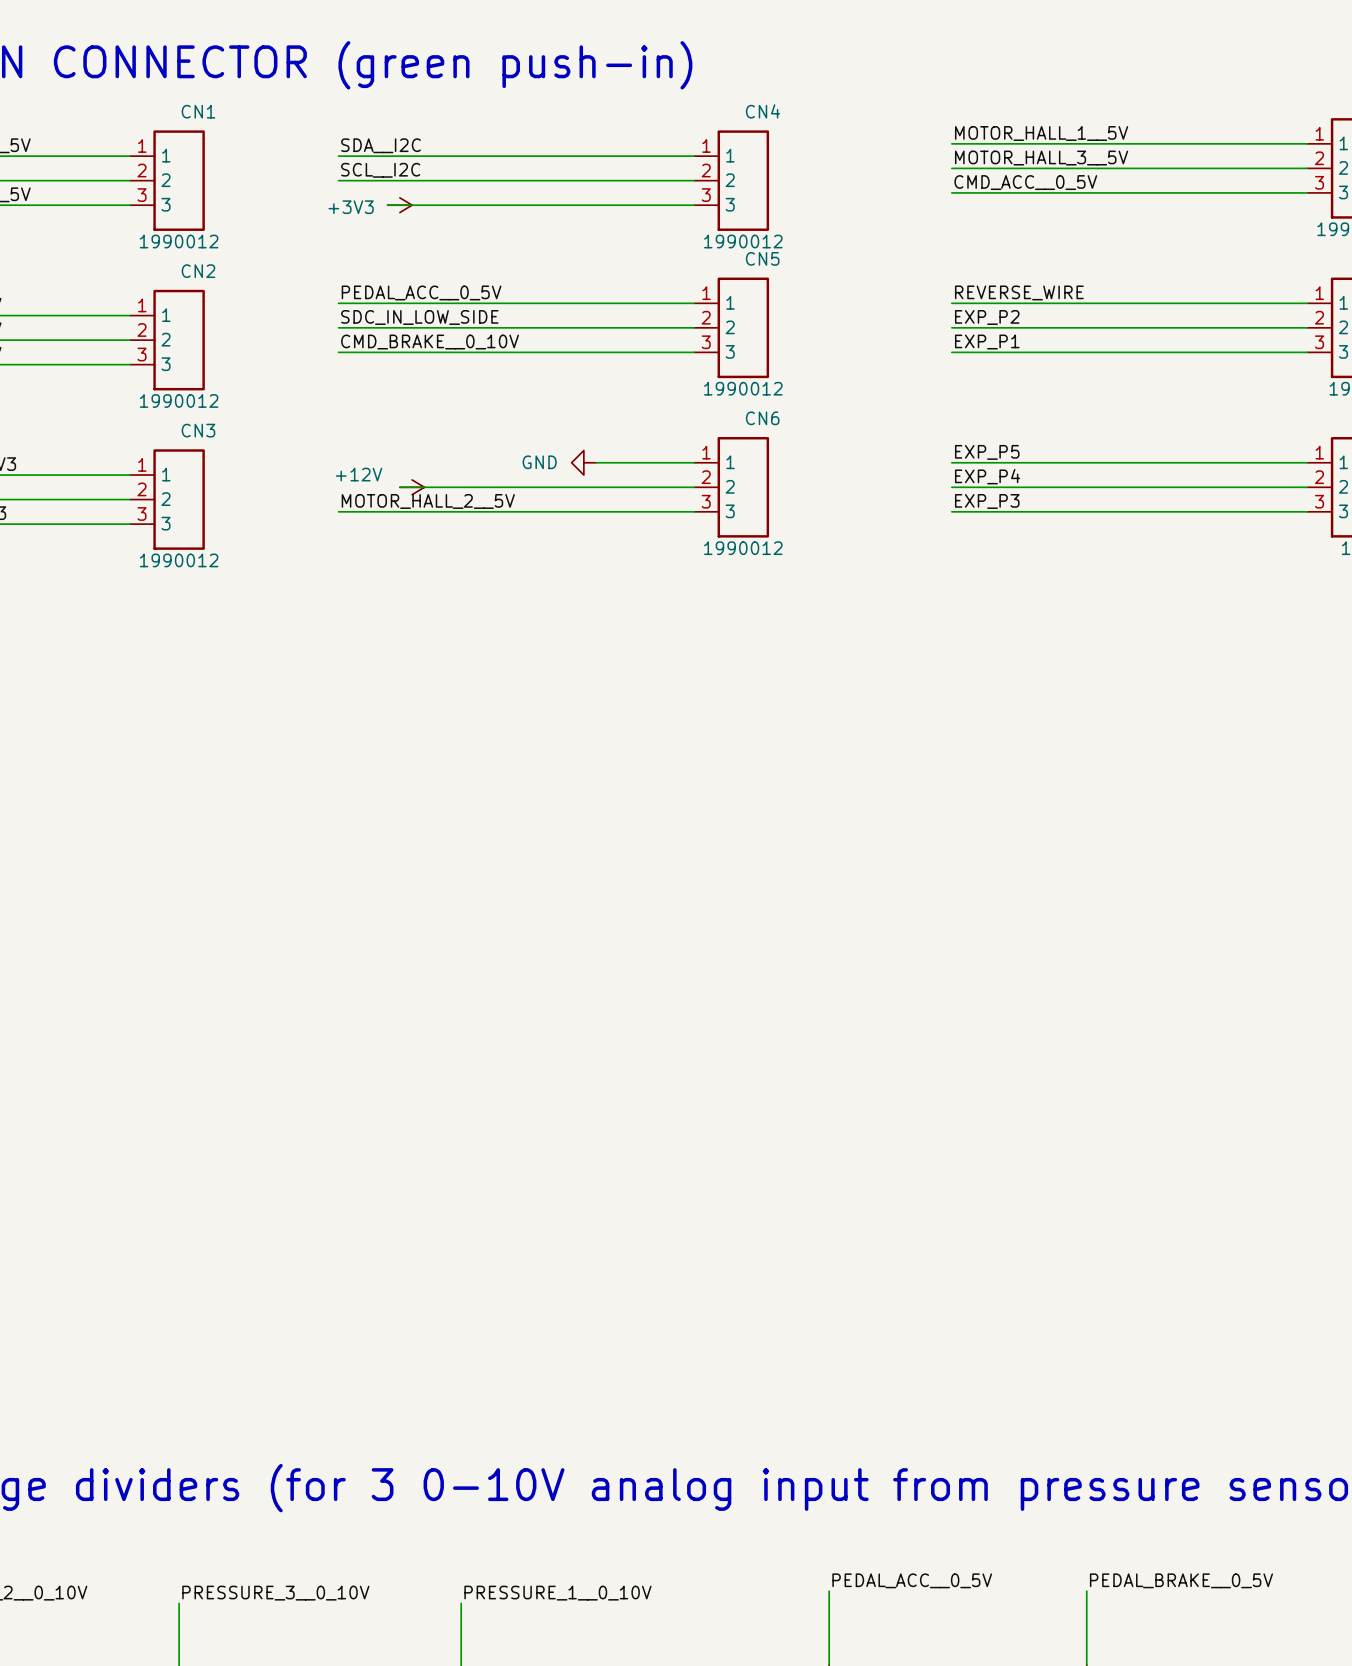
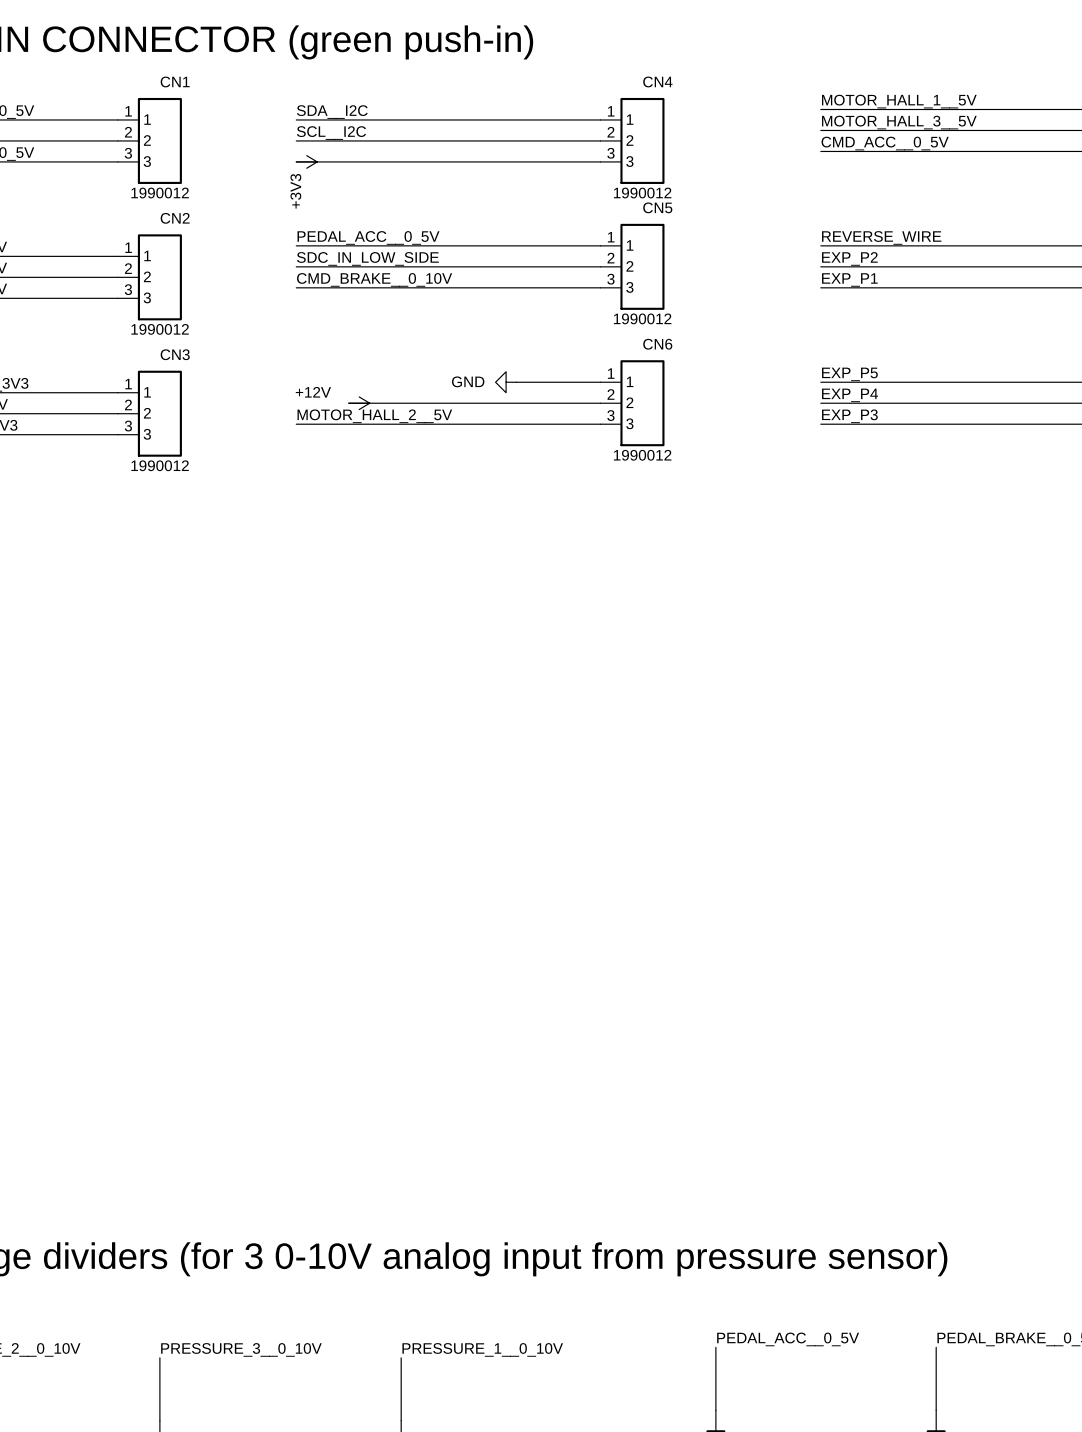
wire: none -> (296, 161) (338, 161)
power symbol position: +3V3 (399, 205) -> +3V3 (306, 161)
power symbol text rotation: 0° (351, 207) -> 90° counterclockwise (295, 191)

